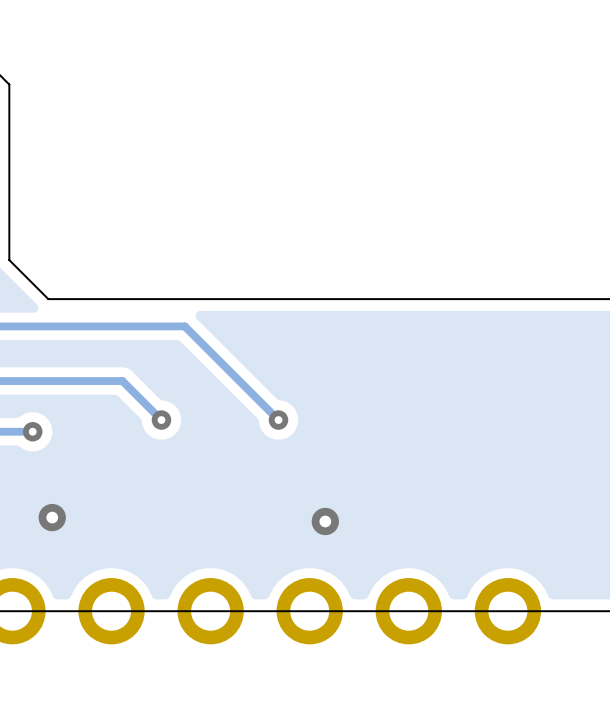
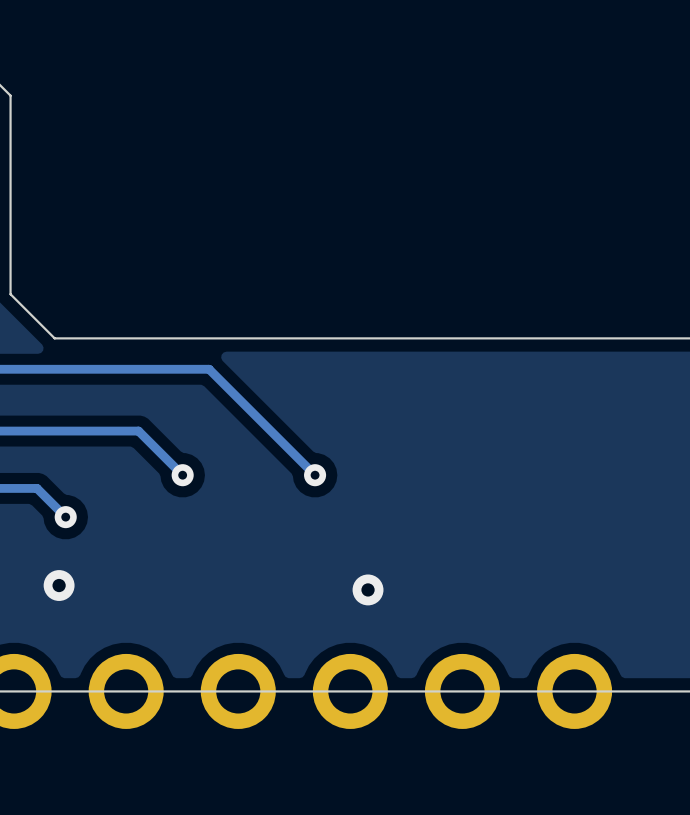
track: none -> (37, 488) (65, 517)
via position: (32, 431) -> (65, 517)

